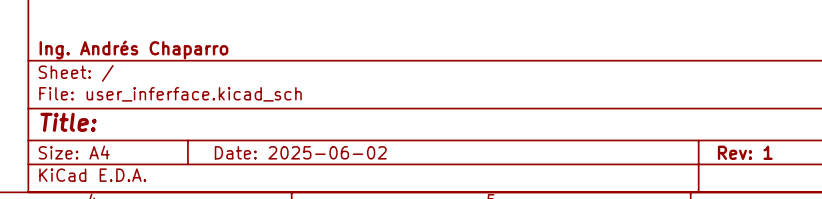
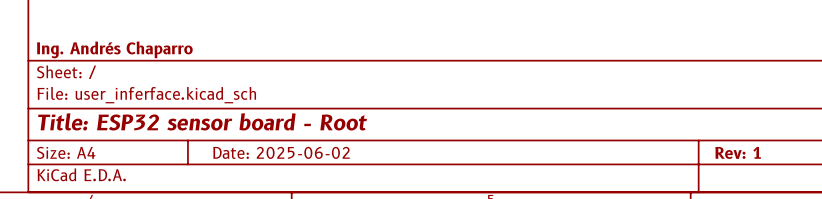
title block: Title: (68, 122) -> Title: ESP32 sensor board - Root (202, 121)

